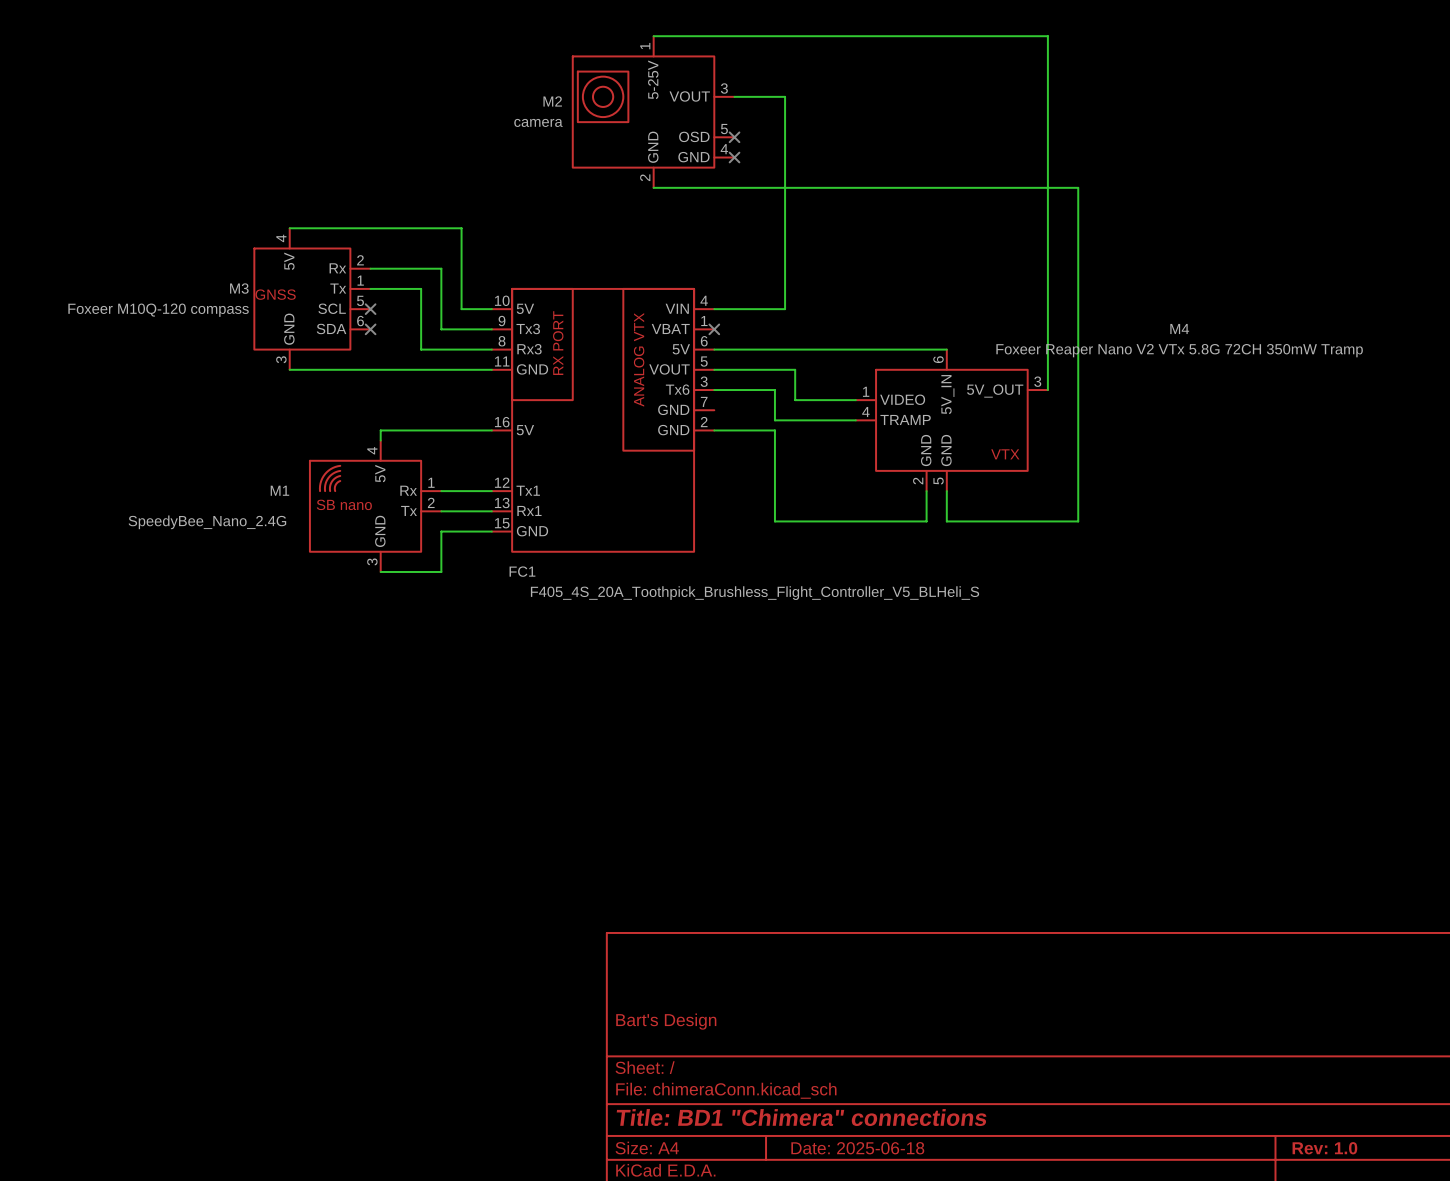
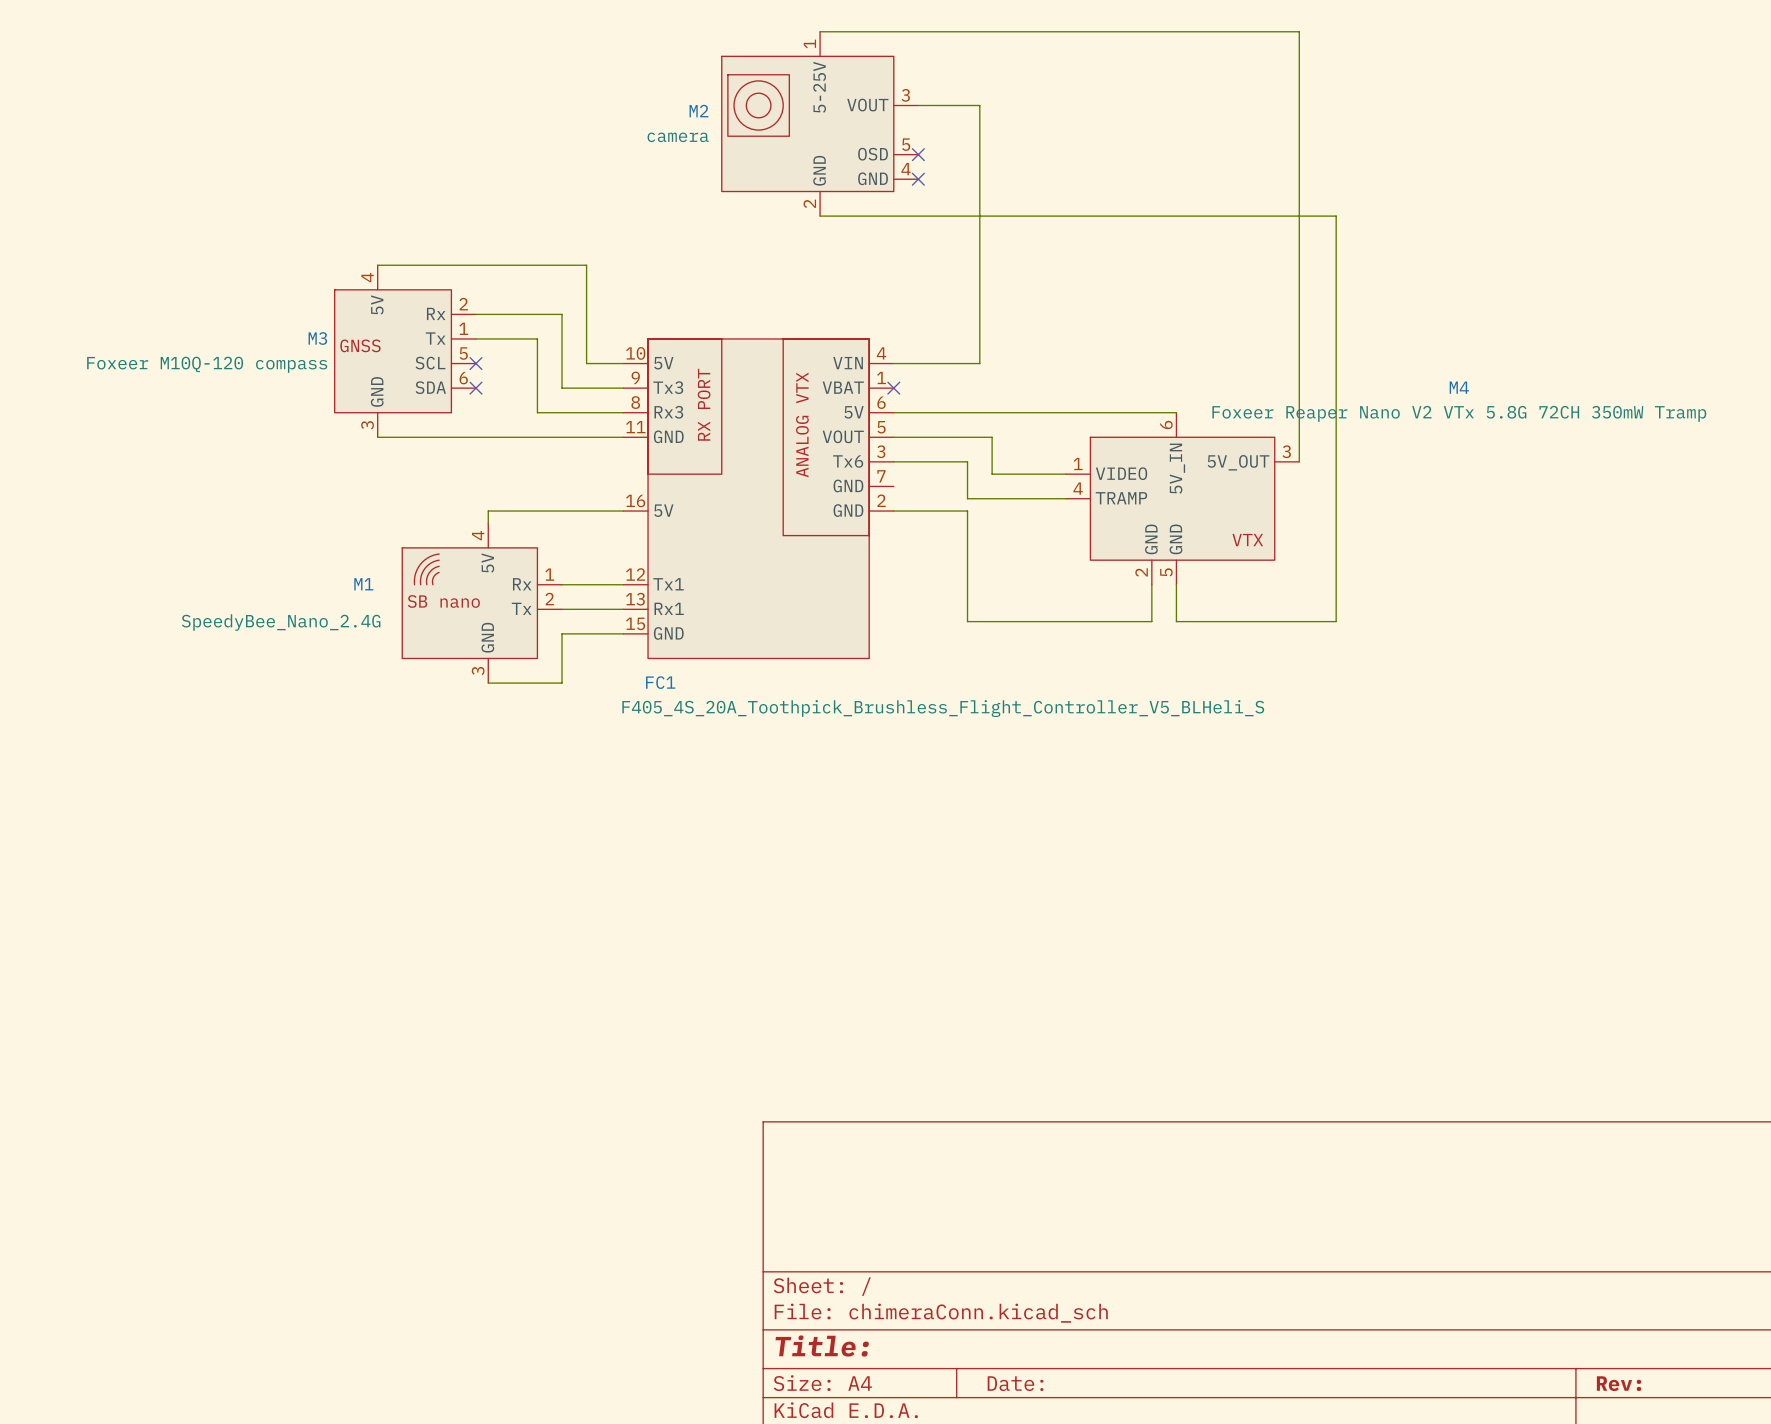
title block: Bart's Design (666, 1021) -> none
title block: Title: BD1 "Chimera" connections (801, 1117) -> Title: (822, 1346)
title block: Date: 2025-06-18 (857, 1148) -> Date: (1015, 1383)
title block: Rev: 1.0 (1324, 1148) -> Rev: (1619, 1383)

